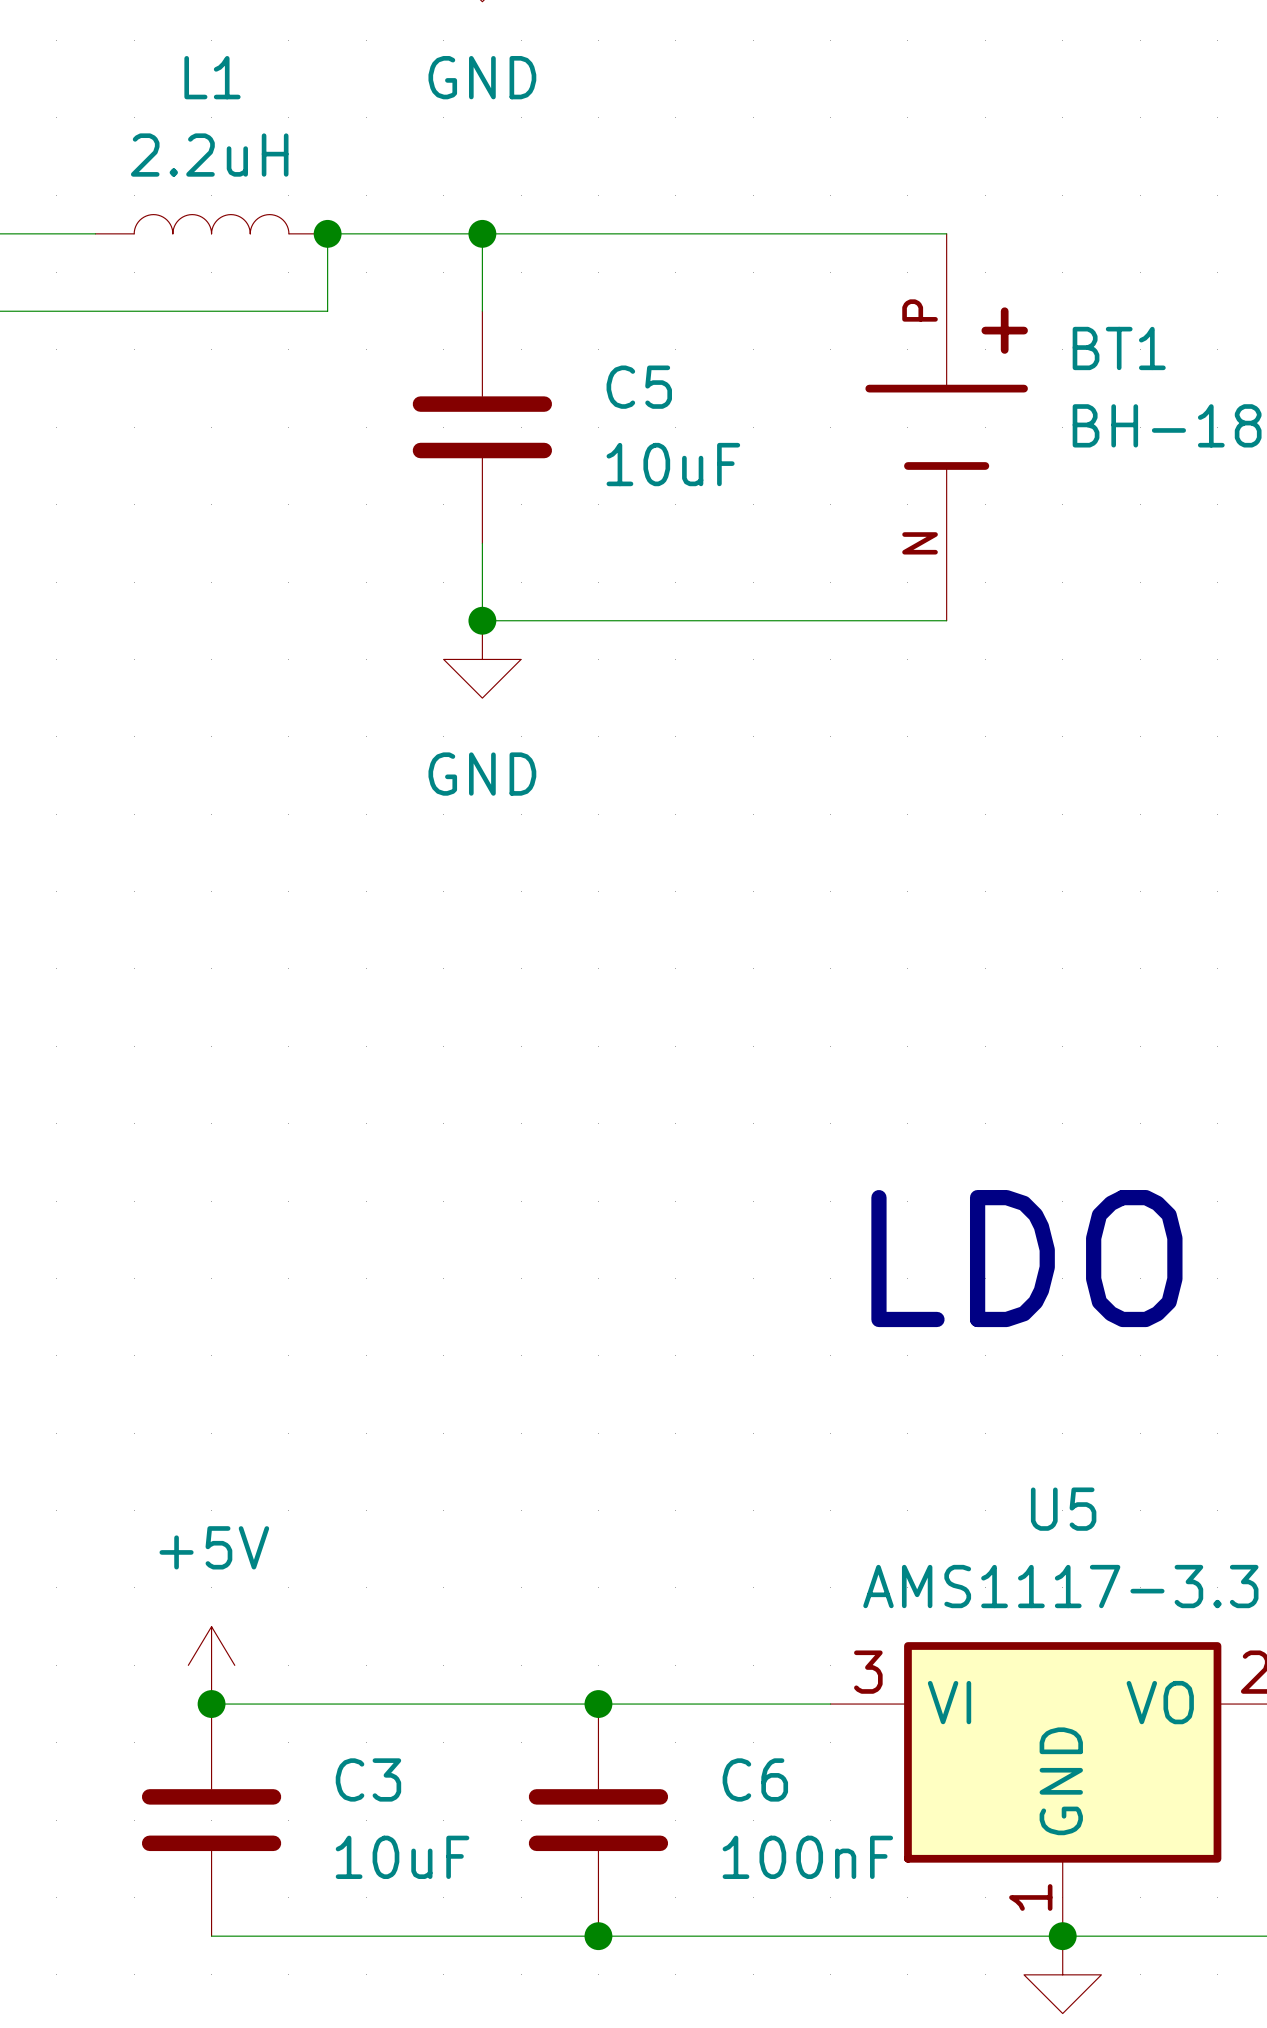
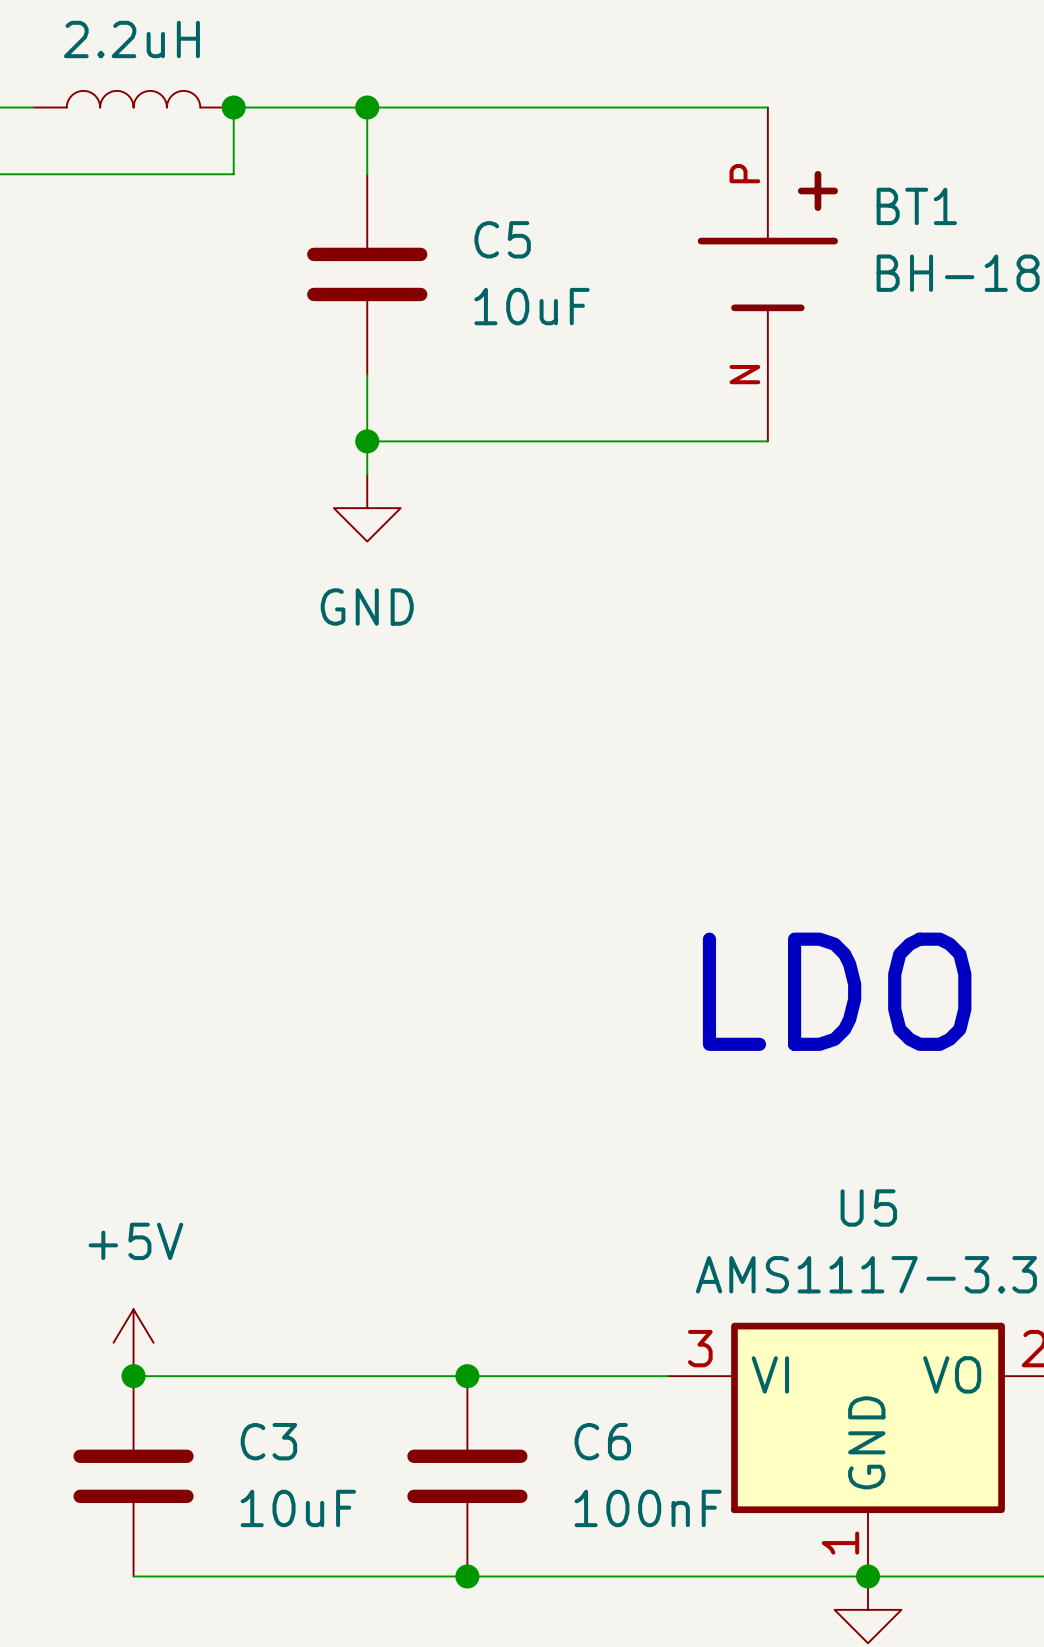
power symbol position: GND (482, 659) -> GND (367, 508)

